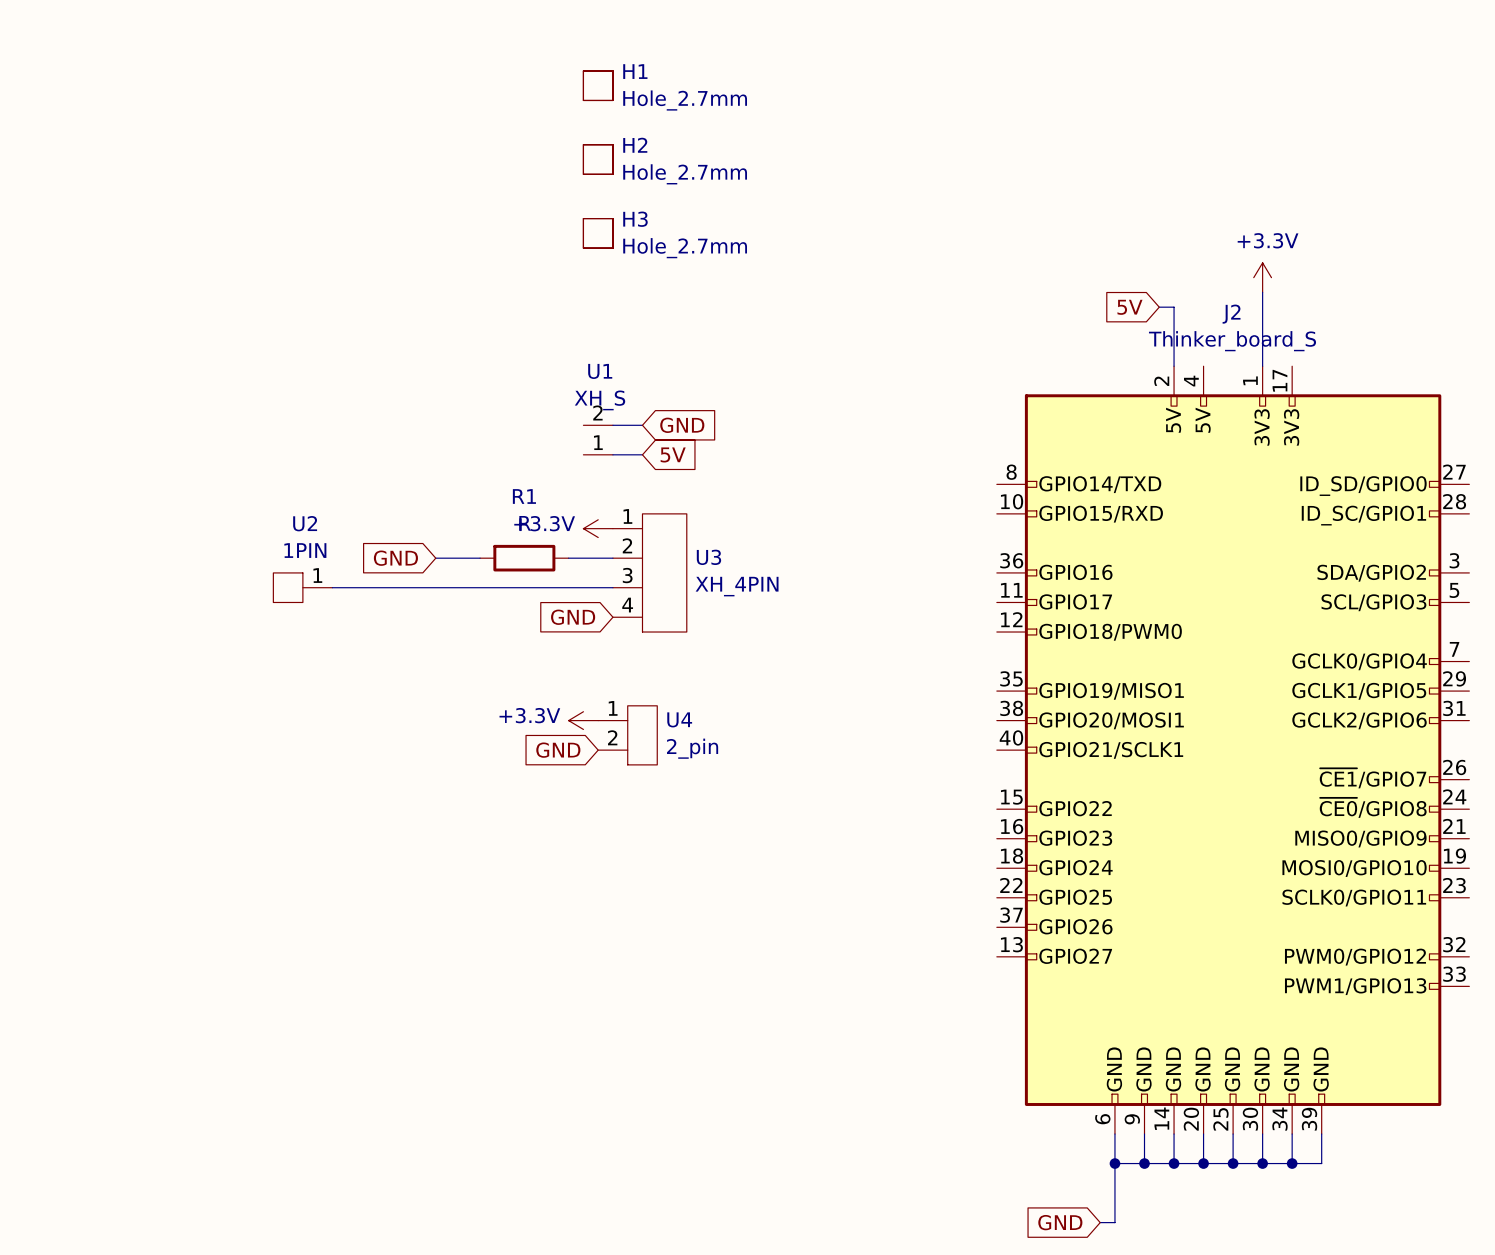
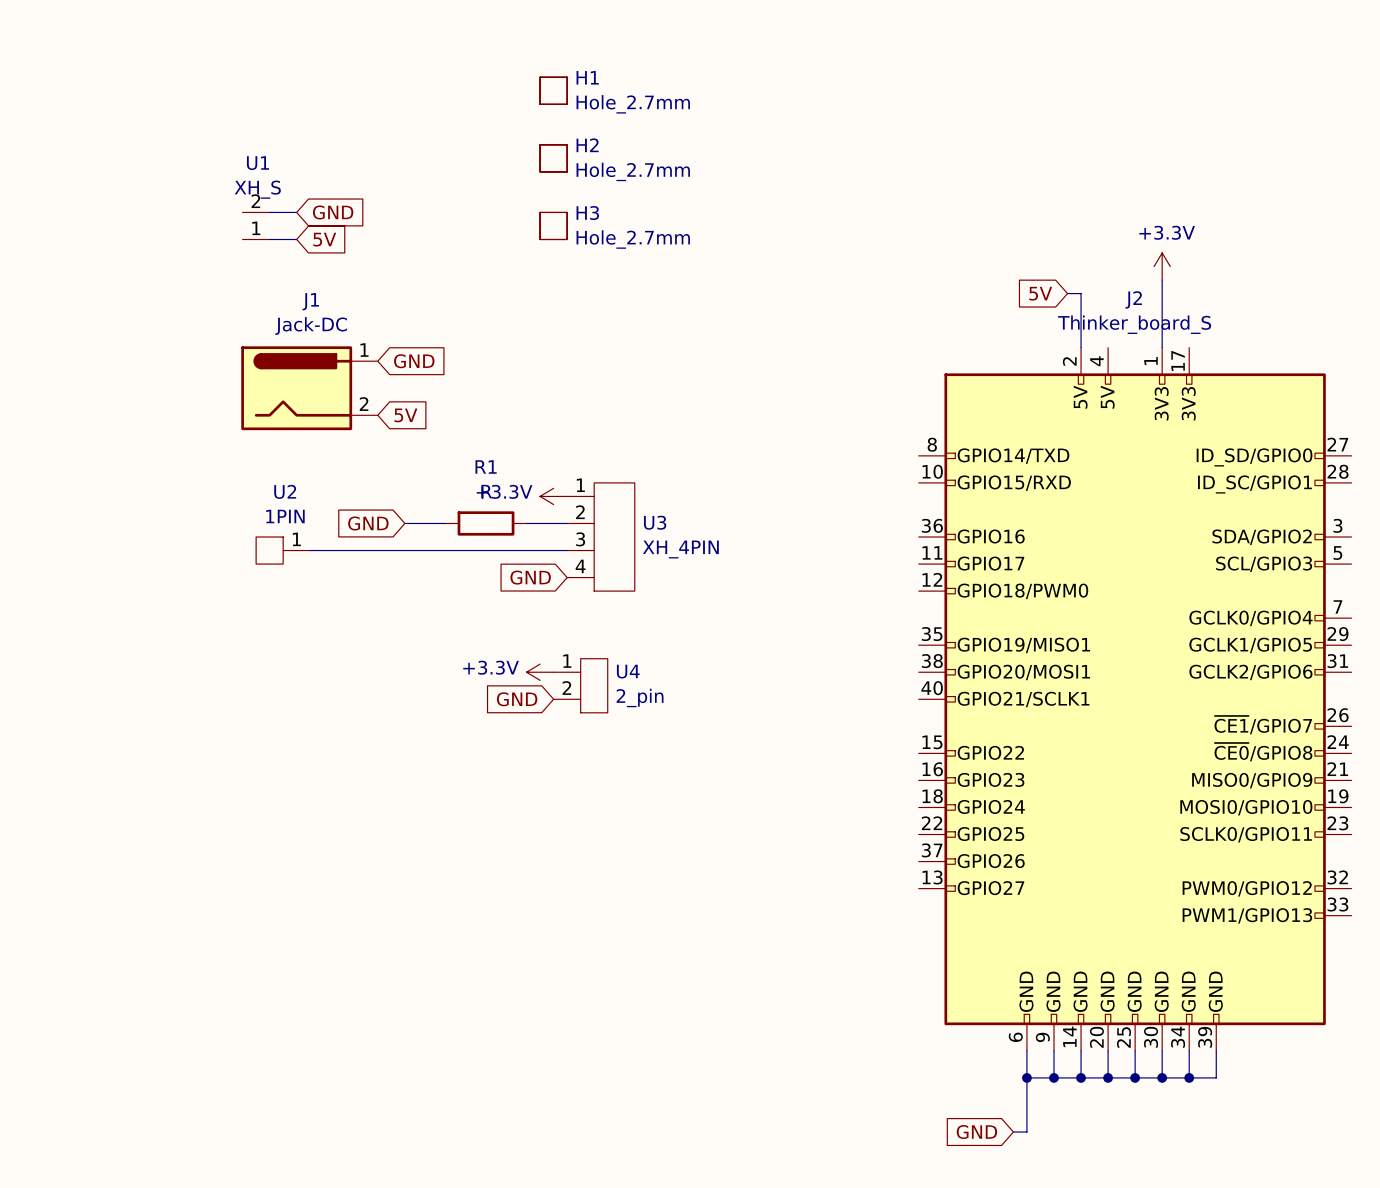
wire: none -> (269, 212) (296, 212)
global label: none -> GND (333, 212)
wire: none -> (269, 239) (296, 239)
global label: none -> 5V (324, 239)
global label: none -> GND (414, 361)
J1: none -> Jack-DC (309, 388)
wire: (612, 425) (642, 425) -> none
global label: GND (682, 425) -> none
global label: none -> 5V (405, 415)
U1 position: (598, 440) -> (256, 225)
wire: (612, 454) (642, 454) -> none
global label: 5V (673, 454) -> none

